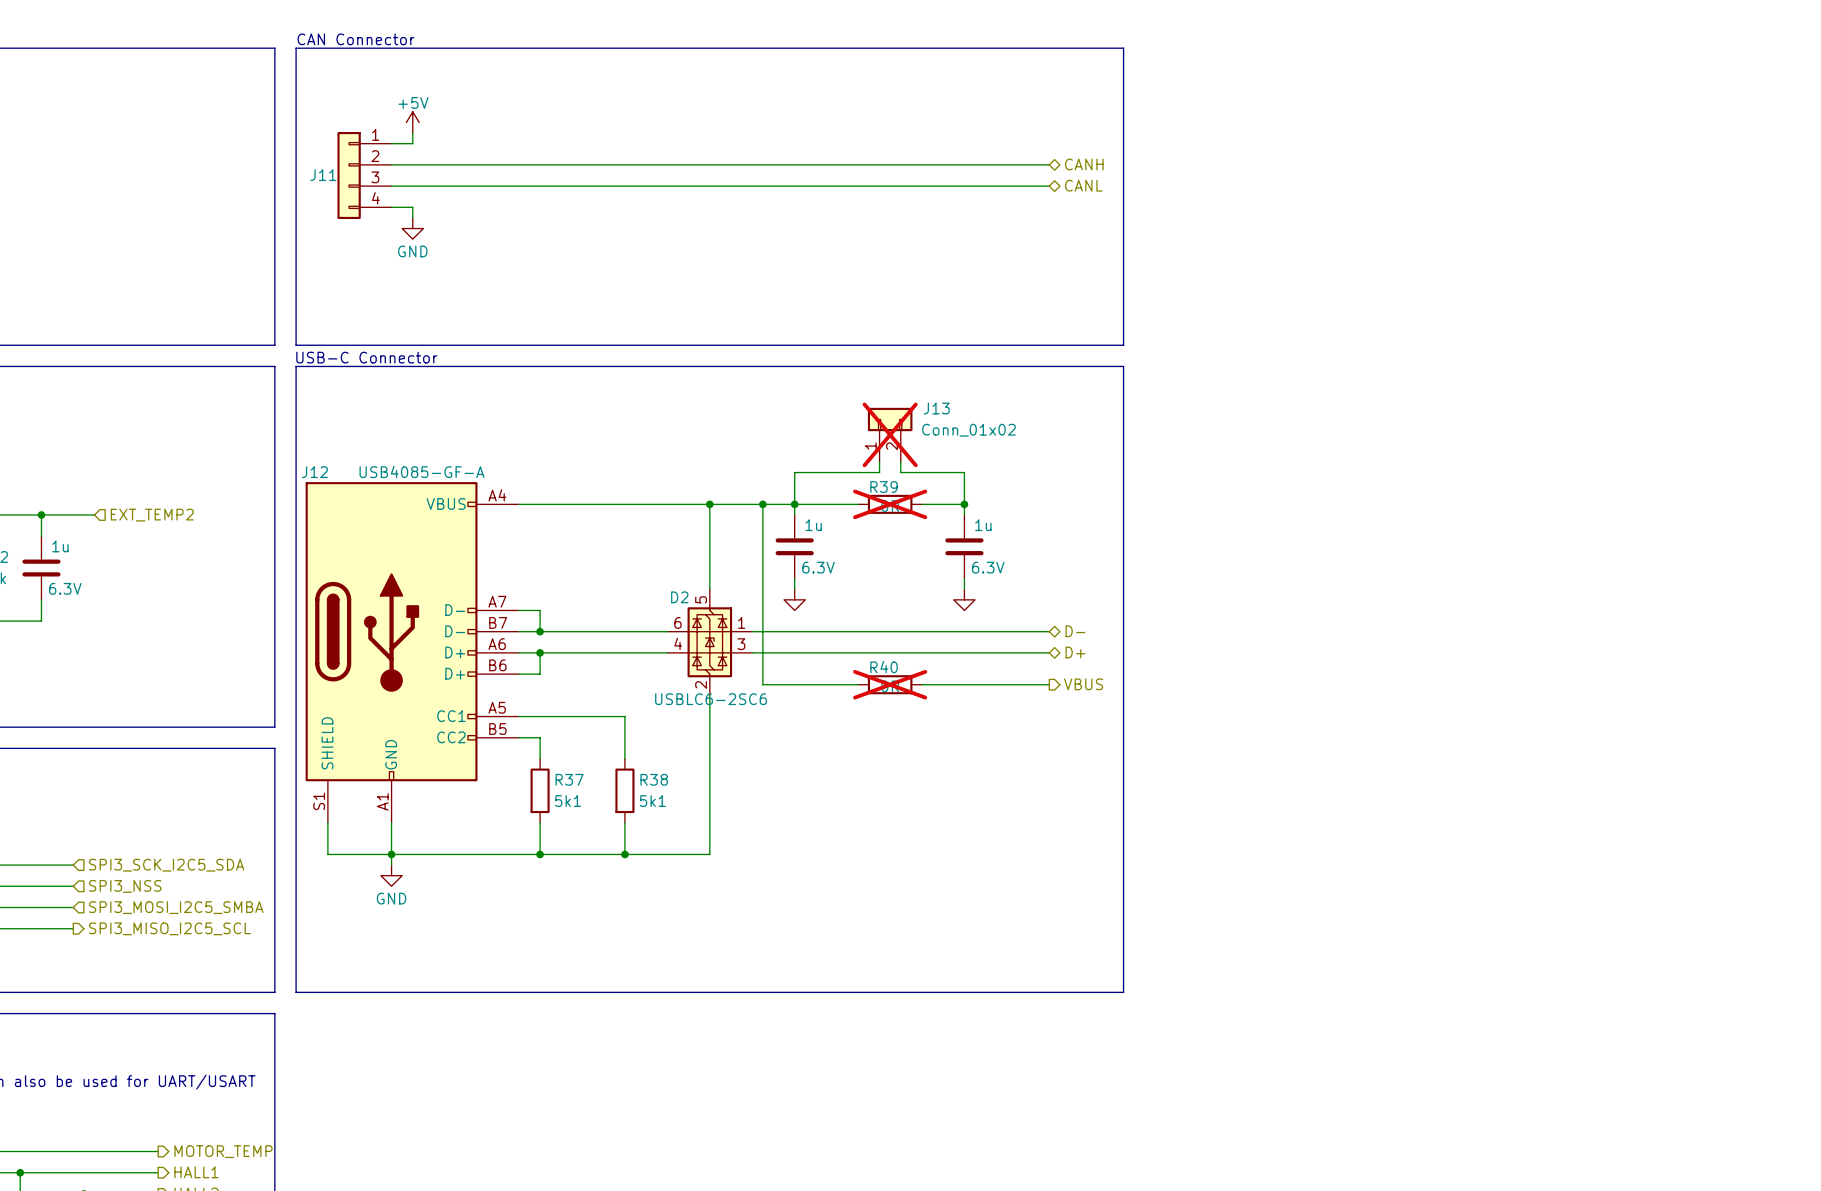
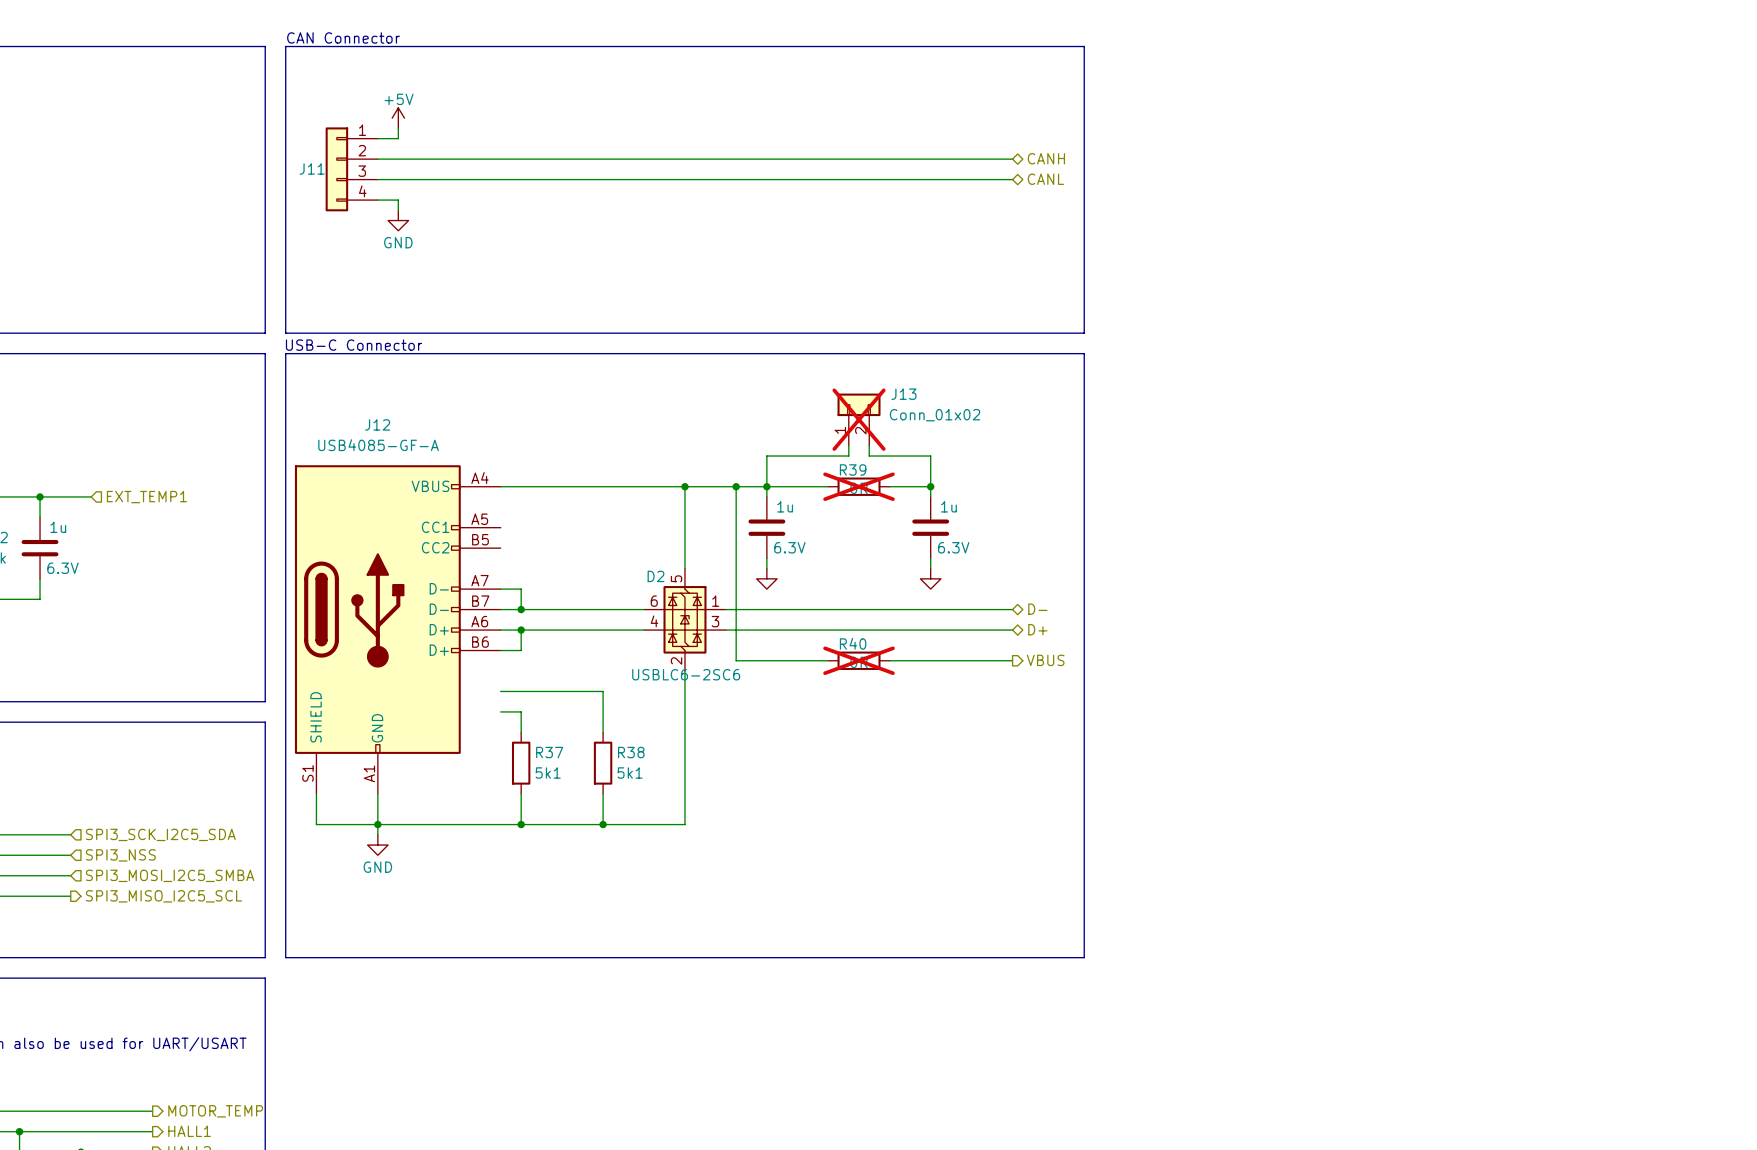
J12 value position: USB4085-GF-A (422, 471) -> USB4085-GF-A (378, 445)
J12 name position: J12 (314, 472) -> J12 (377, 424)
J12 symbol: [305, 482, 519, 823] -> [294, 465, 501, 794]
hierarchical label: EXT_TEMP2 (152, 515) -> EXT_TEMP1 (146, 497)

